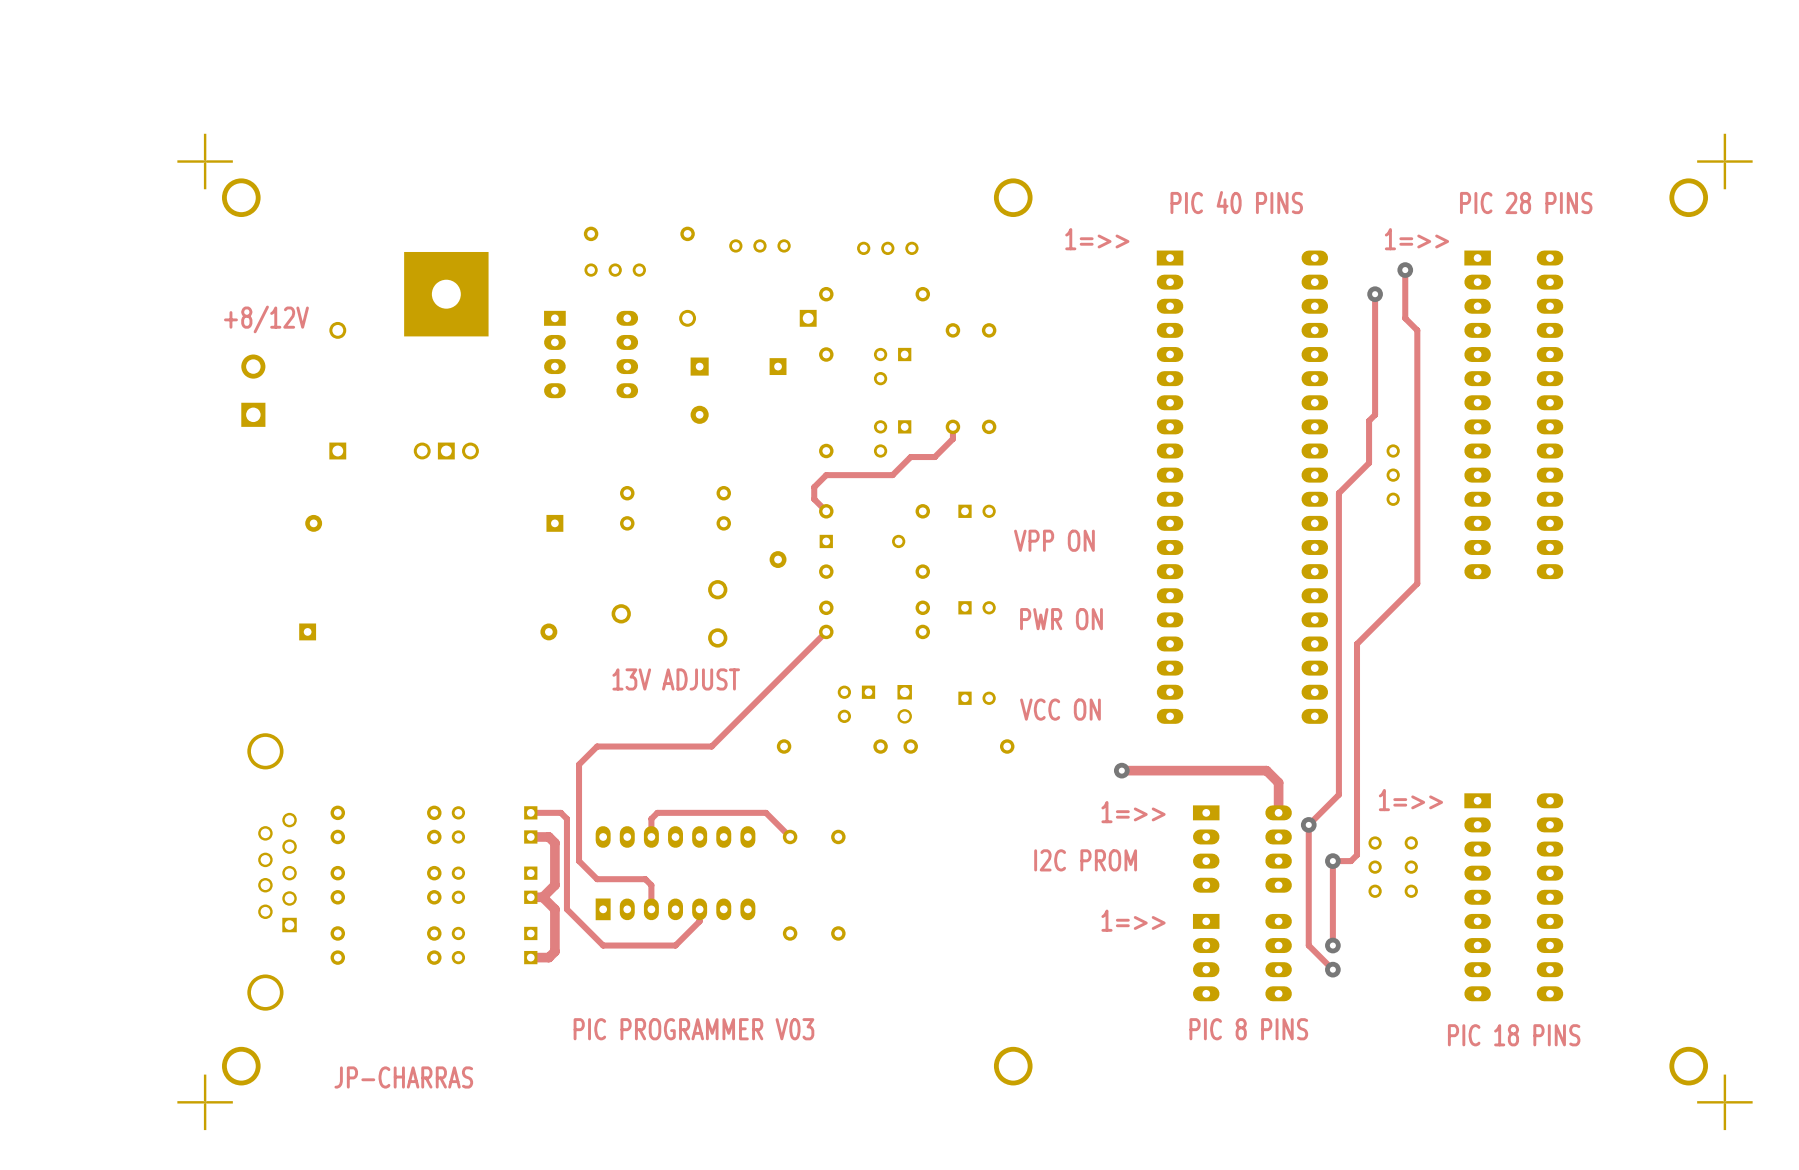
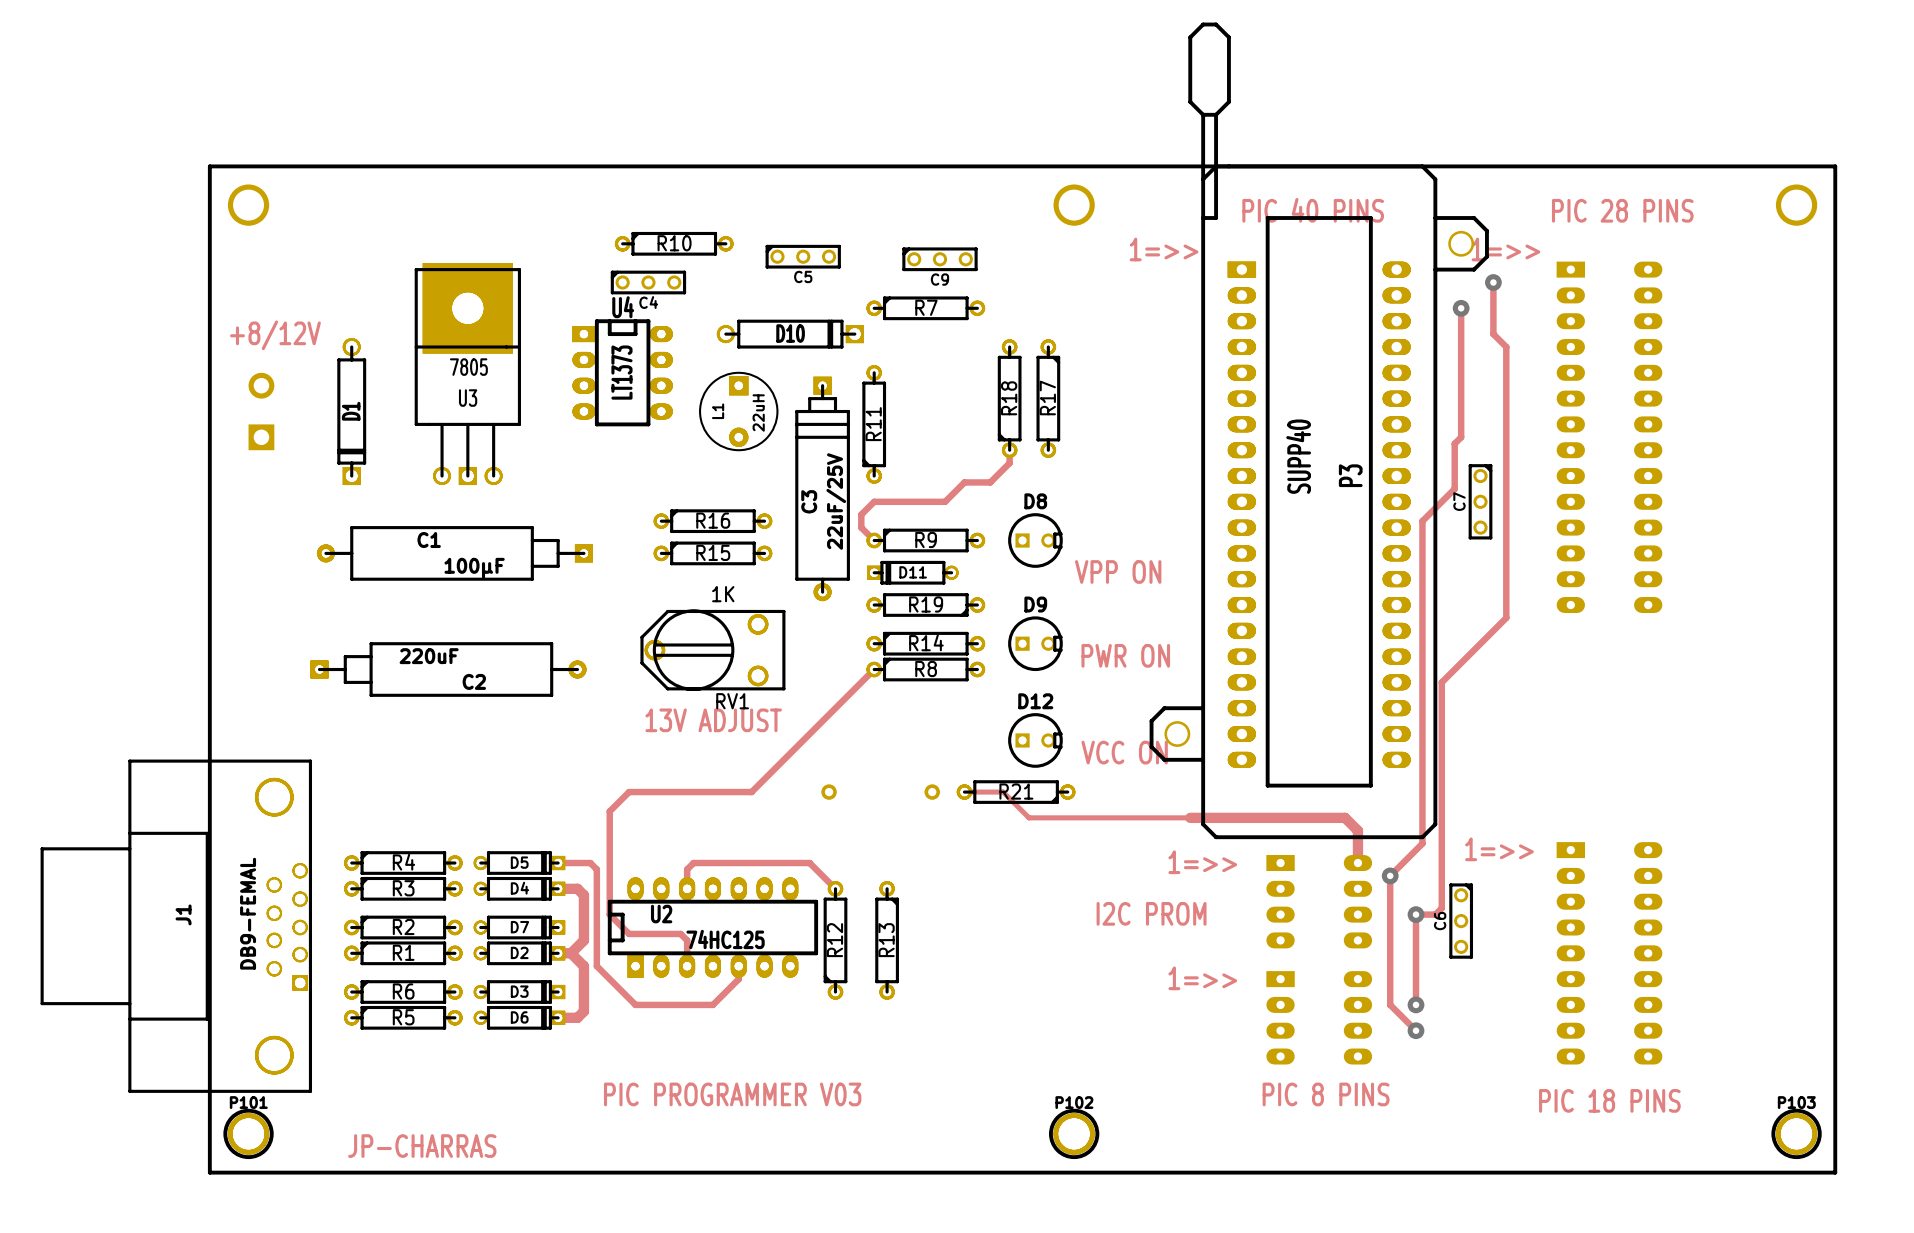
board edge: none -> (209, 166) (209, 1172) (1835, 1172) (1835, 166) (209, 166)
part: (205, 161) -> none
part: (1724, 161) -> none
R10: none -> (674, 243)
part: (759, 245) -> none
C5: none -> (803, 256)
part: (887, 248) -> none
C9: none -> (939, 259)
part: (615, 270) -> none
C4: none -> (648, 282)
R7: none -> (925, 308)
D10: none -> (790, 334)
U4: none -> LT1373 (622, 372)
U3: none -> 7805 (467, 374)
part: (892, 366) -> none
R18: none -> (1009, 398)
R17: none -> (1048, 398)
D1: none -> (351, 411)
L1: none -> 22uH (738, 411)
R11: none -> (874, 424)
P3: none -> SUPP40 (1319, 430)
part: (892, 438) -> none
C3: none -> 22uF/25V (822, 488)
part: (1393, 475) -> none
C7: none -> (1480, 501)
R16: none -> (712, 521)
R9: none -> (925, 540)
part: (977, 511) -> none
D8: none -> (1035, 540)
C1: none -> 100µF (454, 553)
R15: none -> (712, 553)
D11: none -> (912, 572)
R19: none -> (925, 605)
R14: none -> (925, 643)
part: (977, 607) -> none
D9: none -> (1035, 643)
RV1: none -> 1K (712, 650)
C2: none -> 220uF (448, 669)
R8: none -> (925, 669)
part: (977, 698) -> none
D12: none -> (1035, 740)
part: (856, 704) -> none
part: (904, 704) -> none
track: none -> (964, 792) (1003, 792) (1029, 817) (1190, 817)
R21: none -> (1016, 792)
via: (1121, 770) -> none
R4: none -> (403, 863)
D5: none -> (519, 863)
R3: none -> (403, 888)
D4: none -> (519, 888)
part: (1375, 867) -> none
C6: none -> (1461, 921)
part: (1411, 867) -> none
J1: none -> DB9-FEMAL (176, 926)
R2: none -> (403, 927)
D7: none -> (519, 927)
U2: none -> 74HC125 (712, 927)
R12: none -> (835, 940)
R13: none -> (887, 940)
R1: none -> (403, 953)
D2: none -> (519, 953)
R6: none -> (403, 992)
D3: none -> (519, 992)
R5: none -> (403, 1017)
D6: none -> (519, 1017)
P101: none -> (248, 1133)
P102: none -> (1074, 1133)
P103: none -> (1796, 1133)
part: (205, 1102) -> none
part: (1724, 1102) -> none

